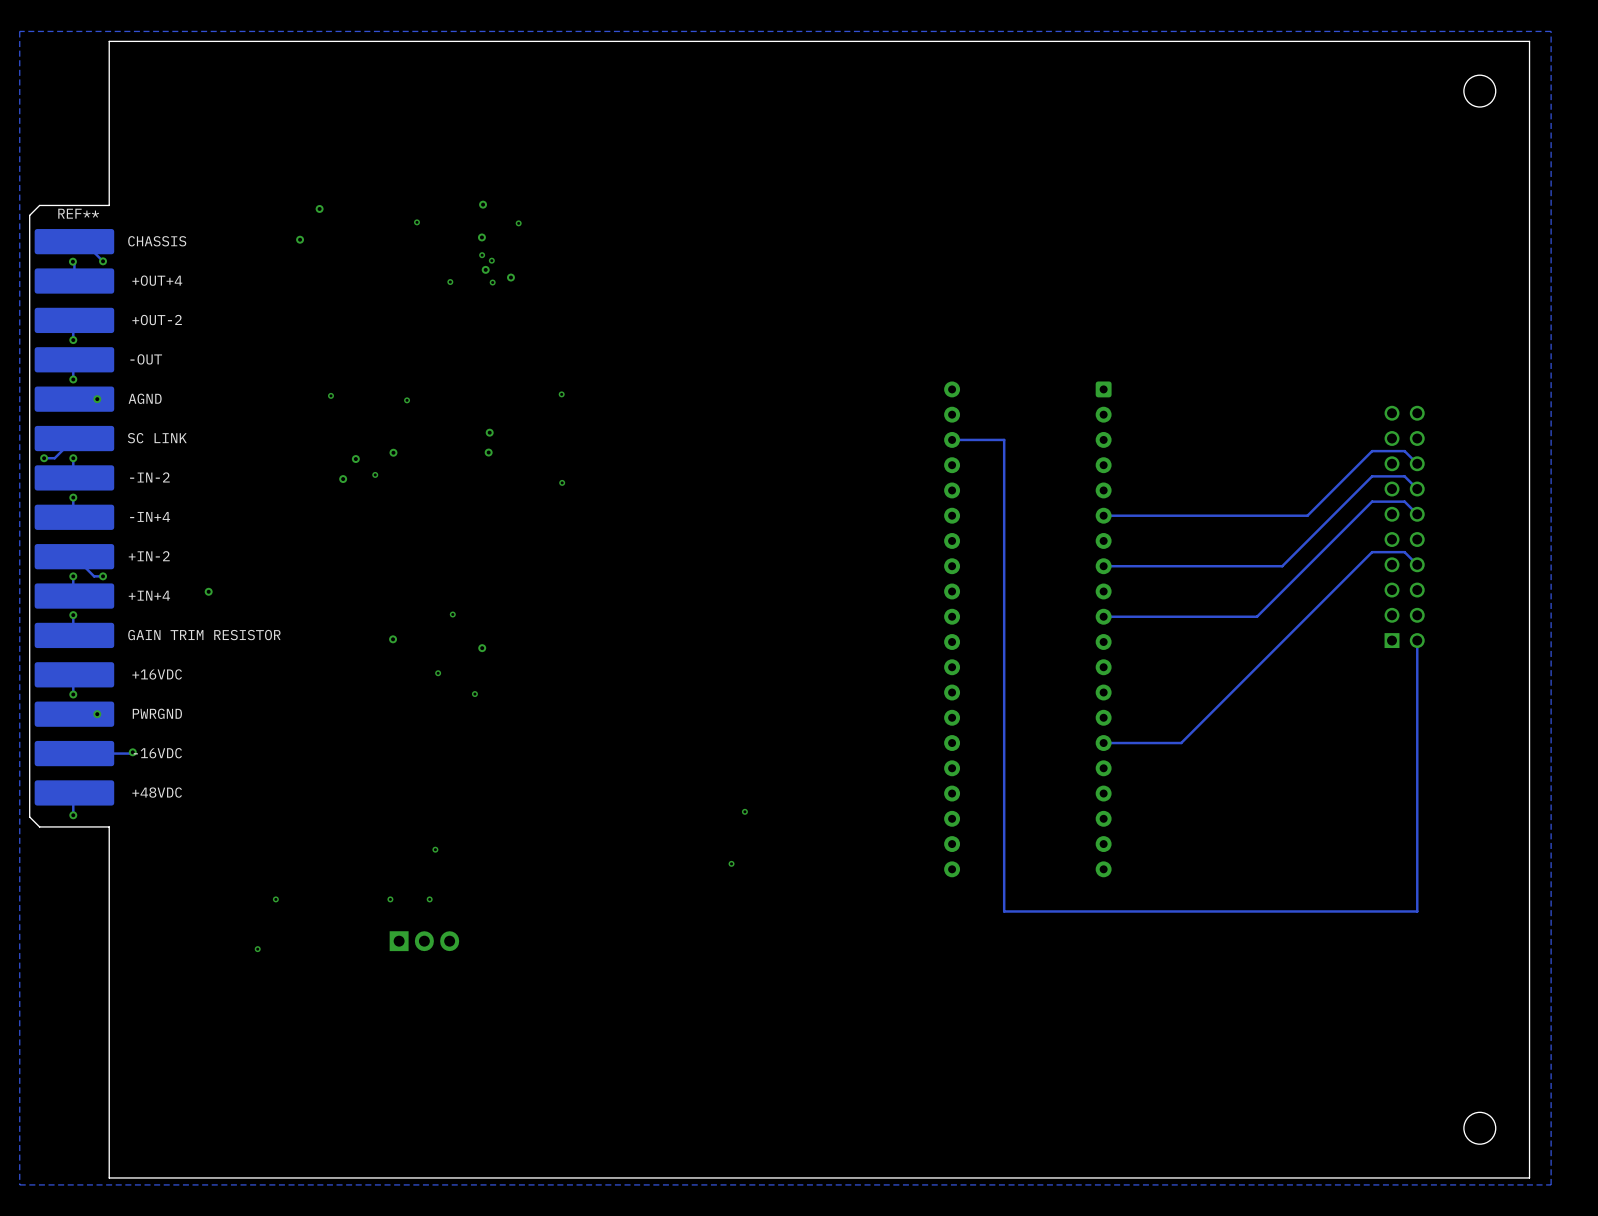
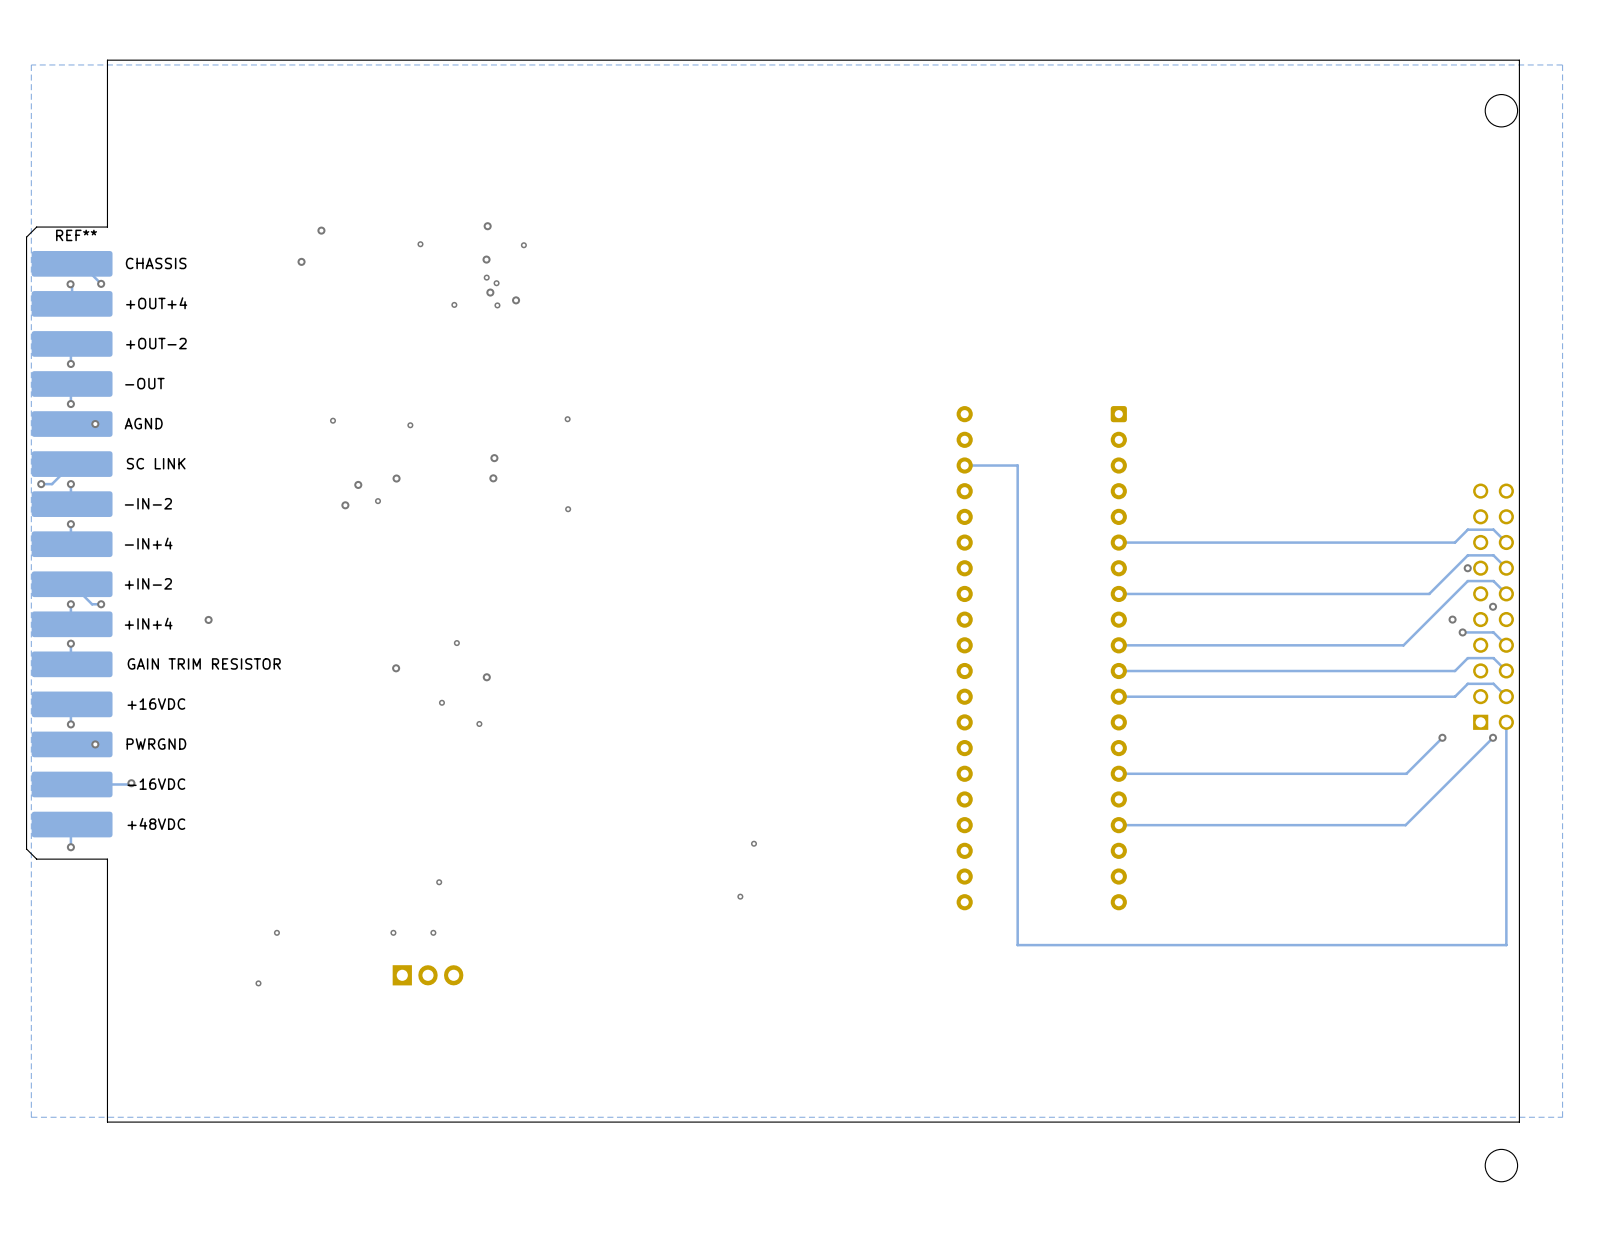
zone outline: (1551, 31) (19, 31) (19, 1184) (1551, 1184) (1551, 31) -> (1562, 64) (1562, 1117) (31, 1117) (31, 64) (1562, 64)
board edge: (1497, 41) (1529, 41) (1529, 1177) (109, 1177) (109, 1085) -> (1519, 60) (1519, 1122) (107, 1122)
track: (1417, 463) (1404, 451) (1372, 451) (1307, 515) -> (1506, 542) (1493, 529) (1467, 529) (1454, 542) (1326, 542)
track: (1417, 489) (1404, 476) (1372, 476) (1282, 566) -> (1506, 568) (1493, 555) (1467, 555) (1429, 593) (1300, 593)
track: (1417, 514) (1404, 501) (1372, 501) (1257, 616) -> (1506, 593) (1493, 581) (1467, 581) (1403, 645) (1274, 645)
part position: (1404, 526) -> (1493, 606)
via: none -> (1467, 568)
track: (1417, 564) (1404, 552) (1372, 552) (1181, 743) -> (1442, 737) (1406, 773) (1197, 773)
via: none -> (1493, 606)
via: none -> (1452, 619)
track: none -> (1462, 632) (1493, 632) (1506, 645)
via: none -> (1462, 632)
track: (1417, 640) (1417, 911) -> (1506, 722) (1506, 945) (1437, 945)
track: none -> (1506, 670) (1493, 658) (1467, 658) (1454, 671) (1118, 671)
track: none -> (1506, 696) (1493, 683) (1467, 683) (1454, 696) (1118, 696)
via: none -> (1442, 737)
track: none -> (1493, 737) (1405, 825) (1118, 825)
via: none -> (1493, 737)

